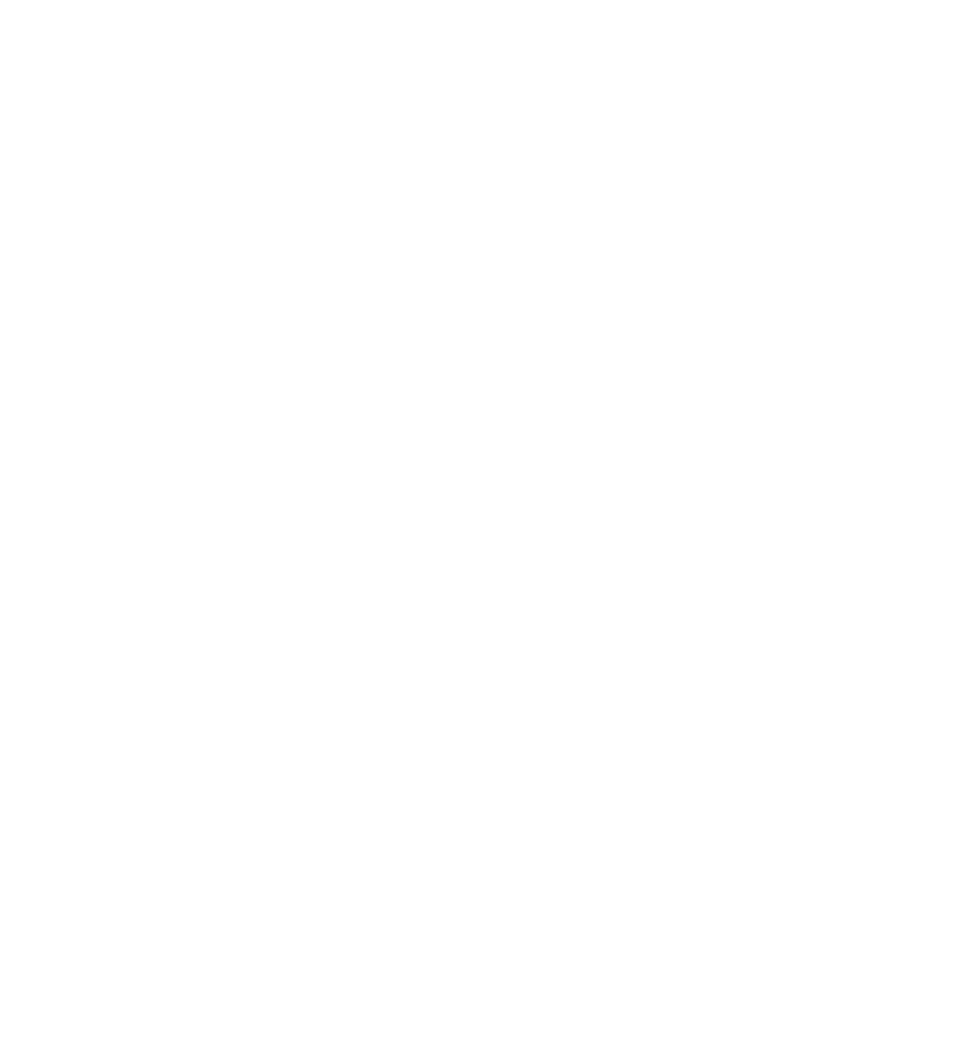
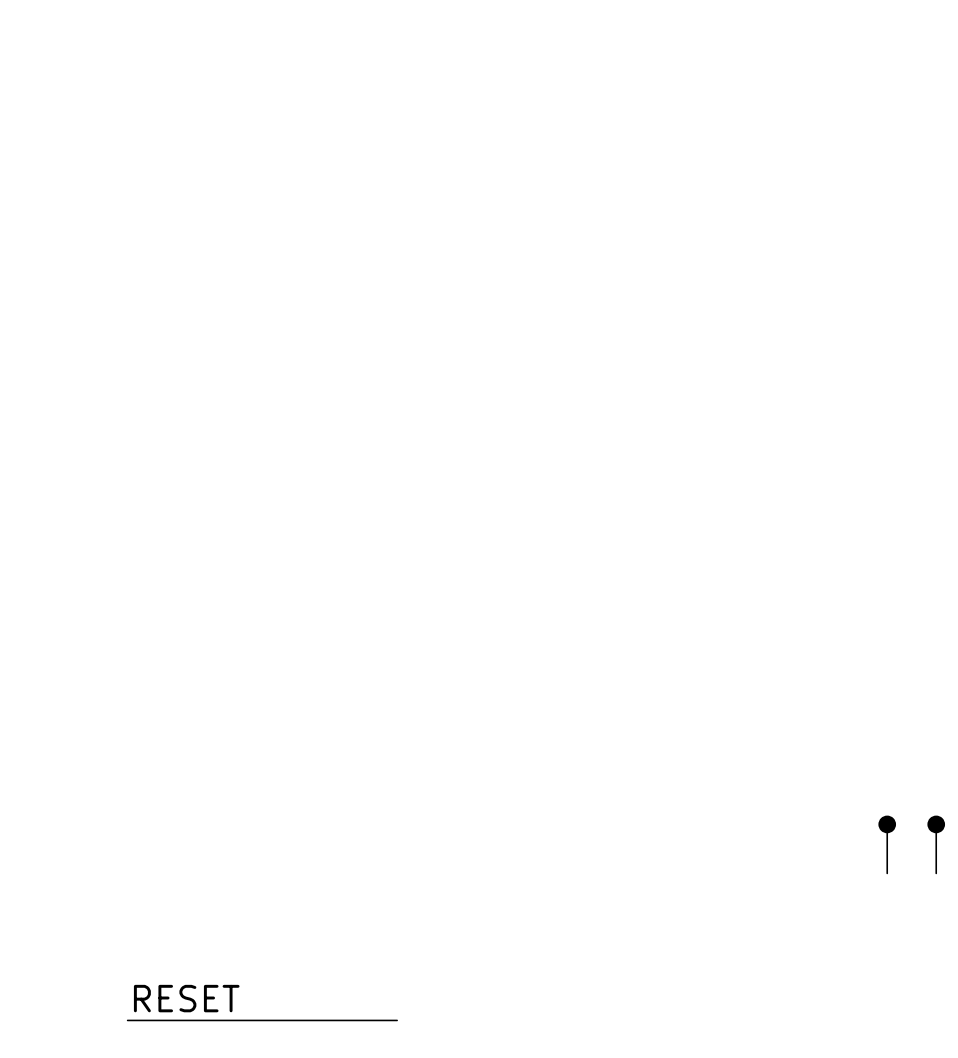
wire: none -> (887, 824) (887, 873)
junction: none -> (887, 824)
wire: none -> (936, 824) (936, 873)
junction: none -> (936, 824)
label: none -> RESET (186, 998)
wire: none -> (127, 1020) (397, 1020)

